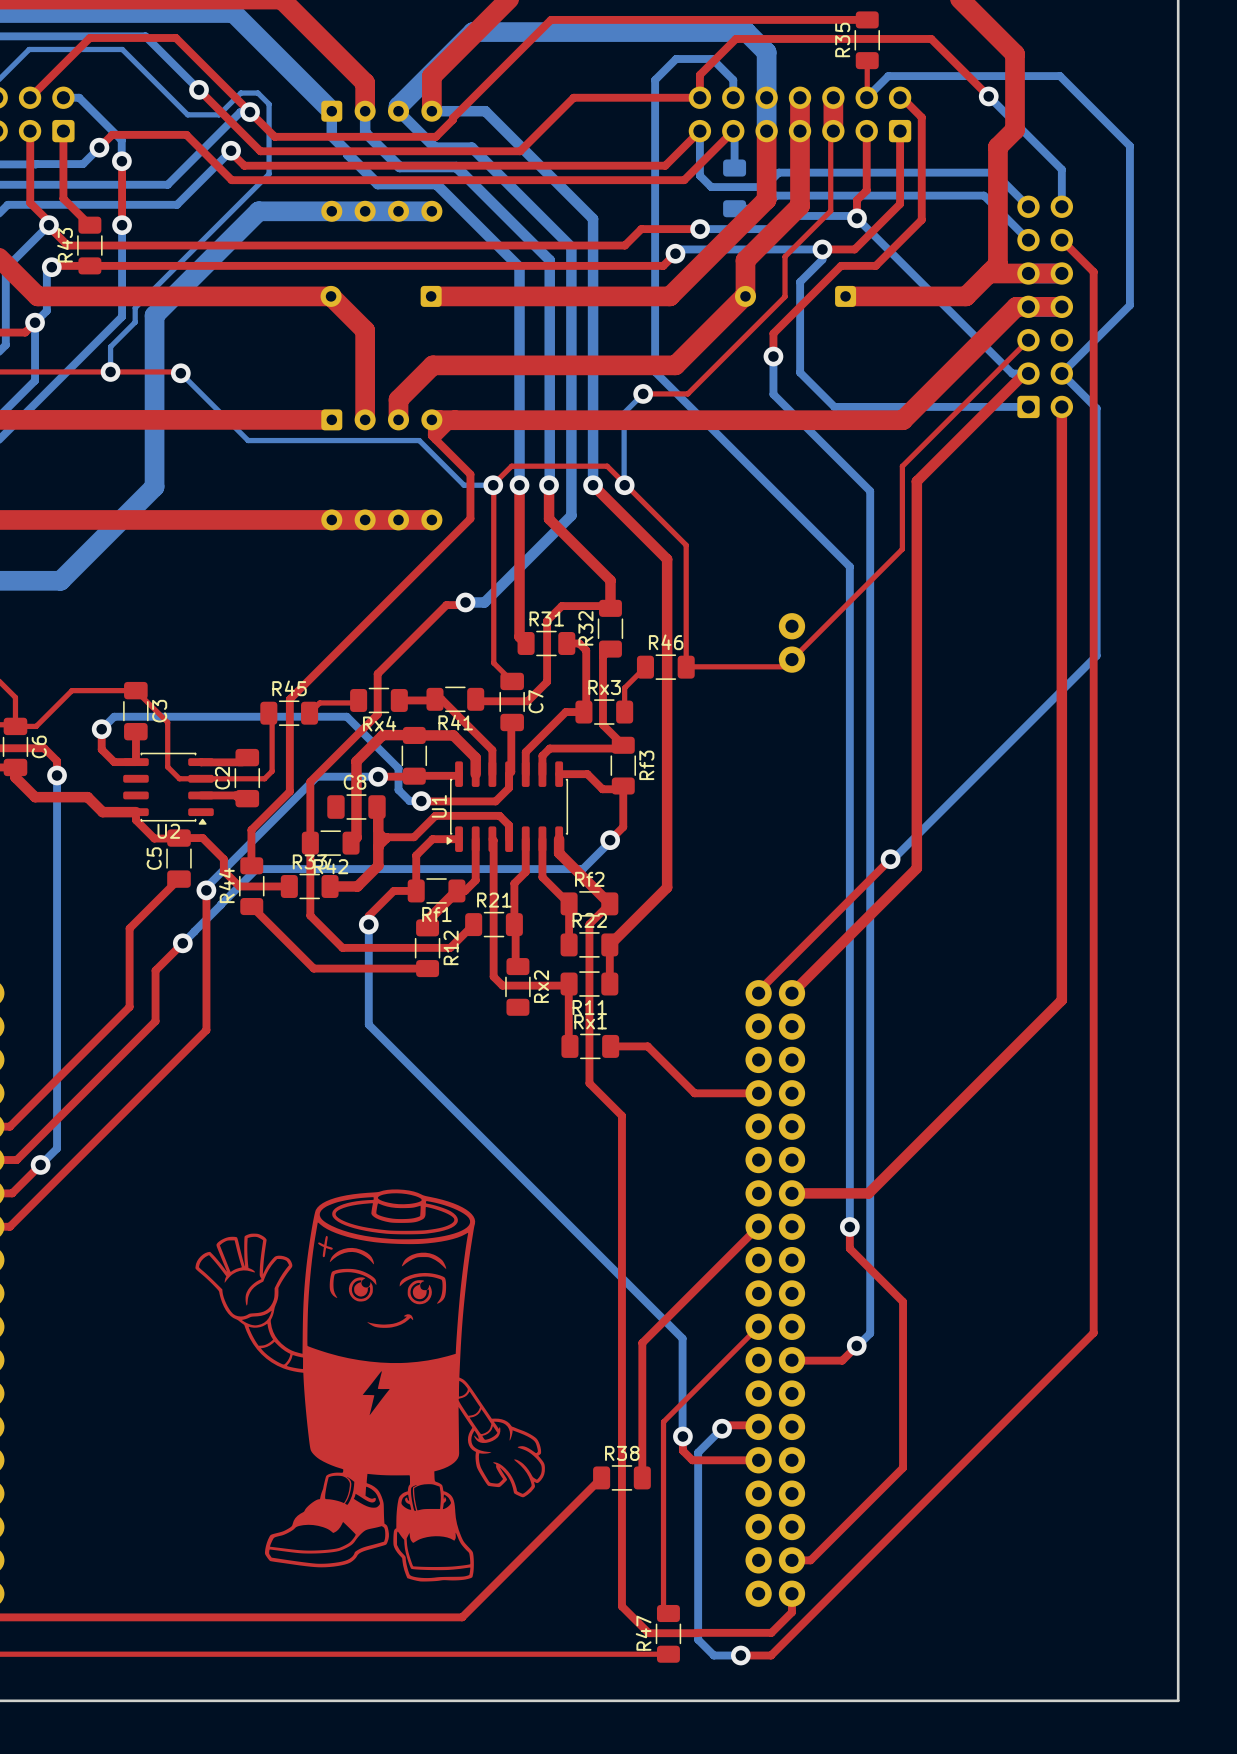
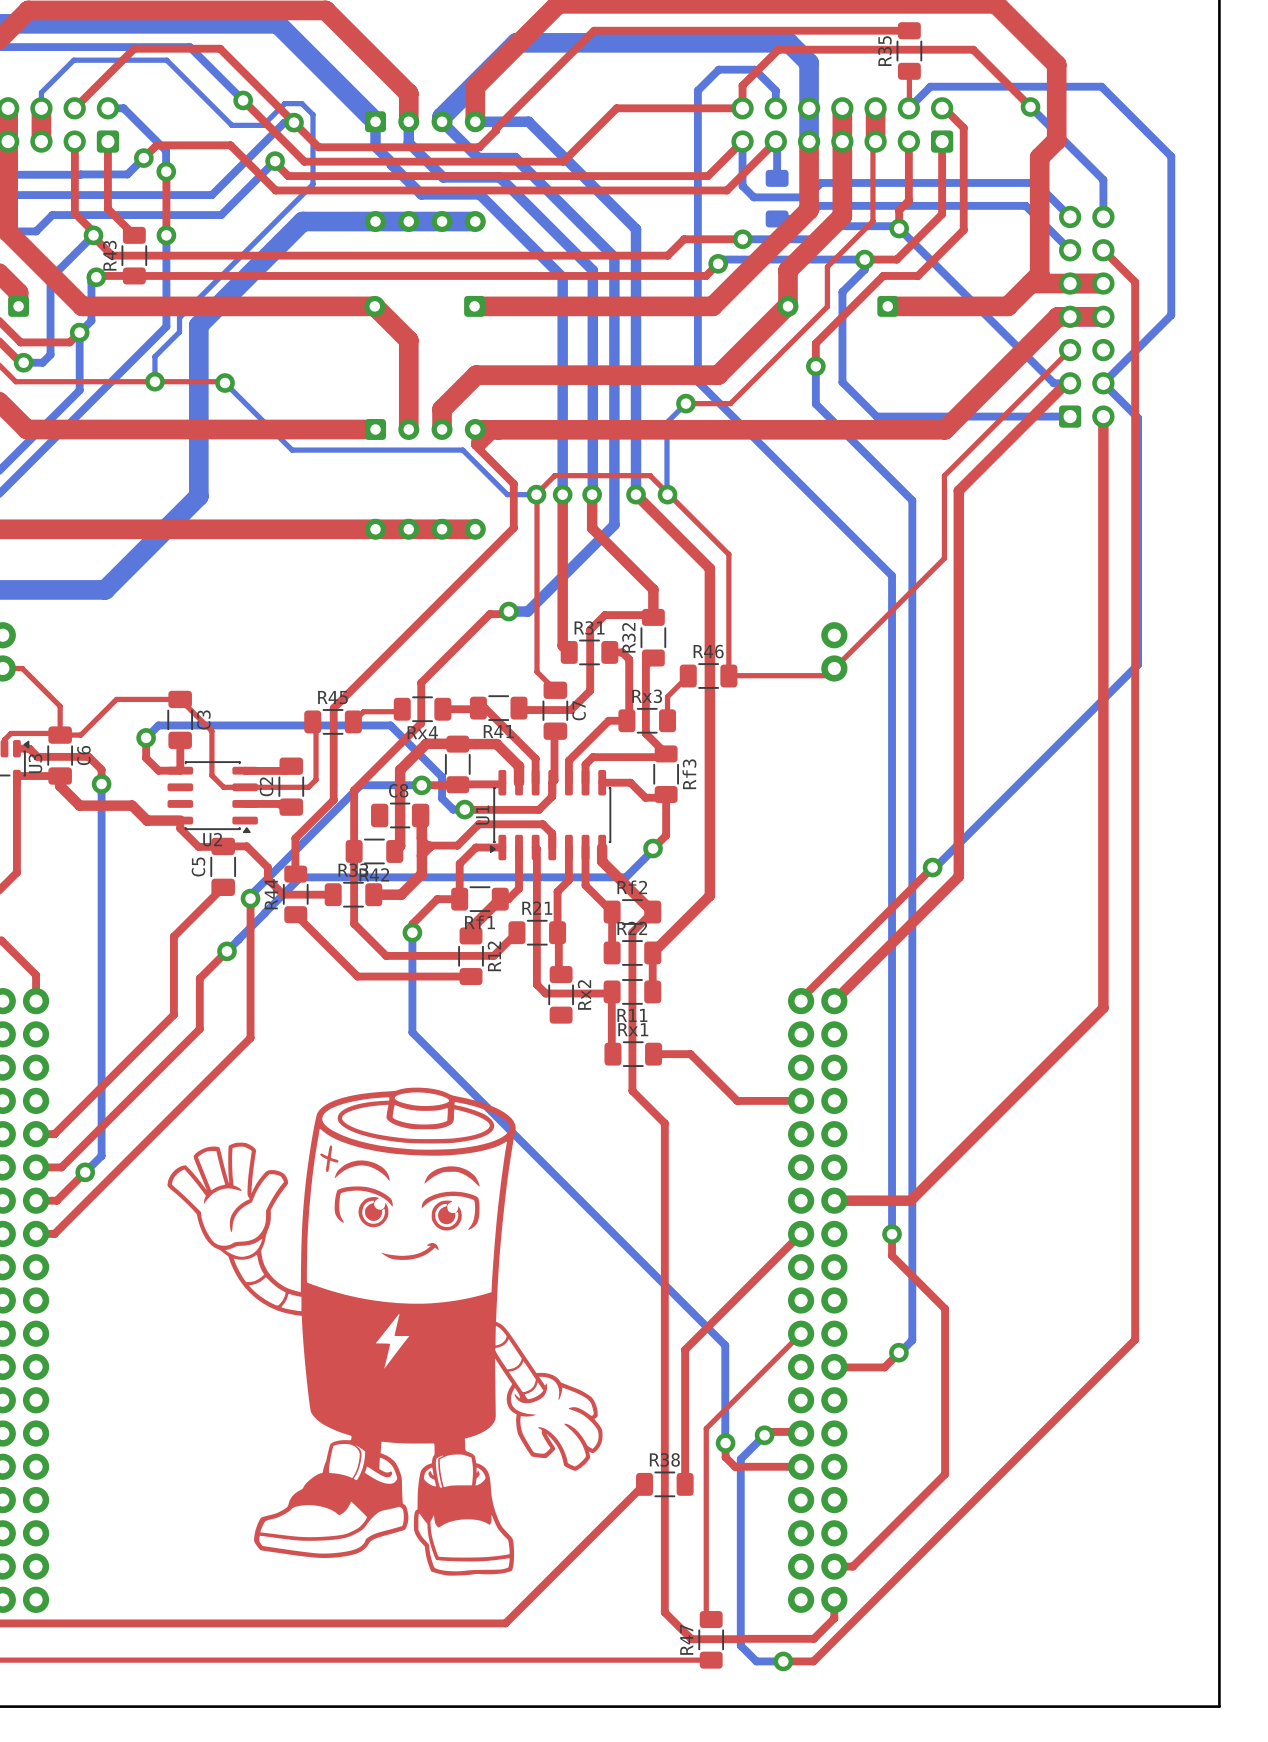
drawing: none -> [167, 1087, 603, 1576]
drawing: [195, 1189, 545, 1582] -> none

